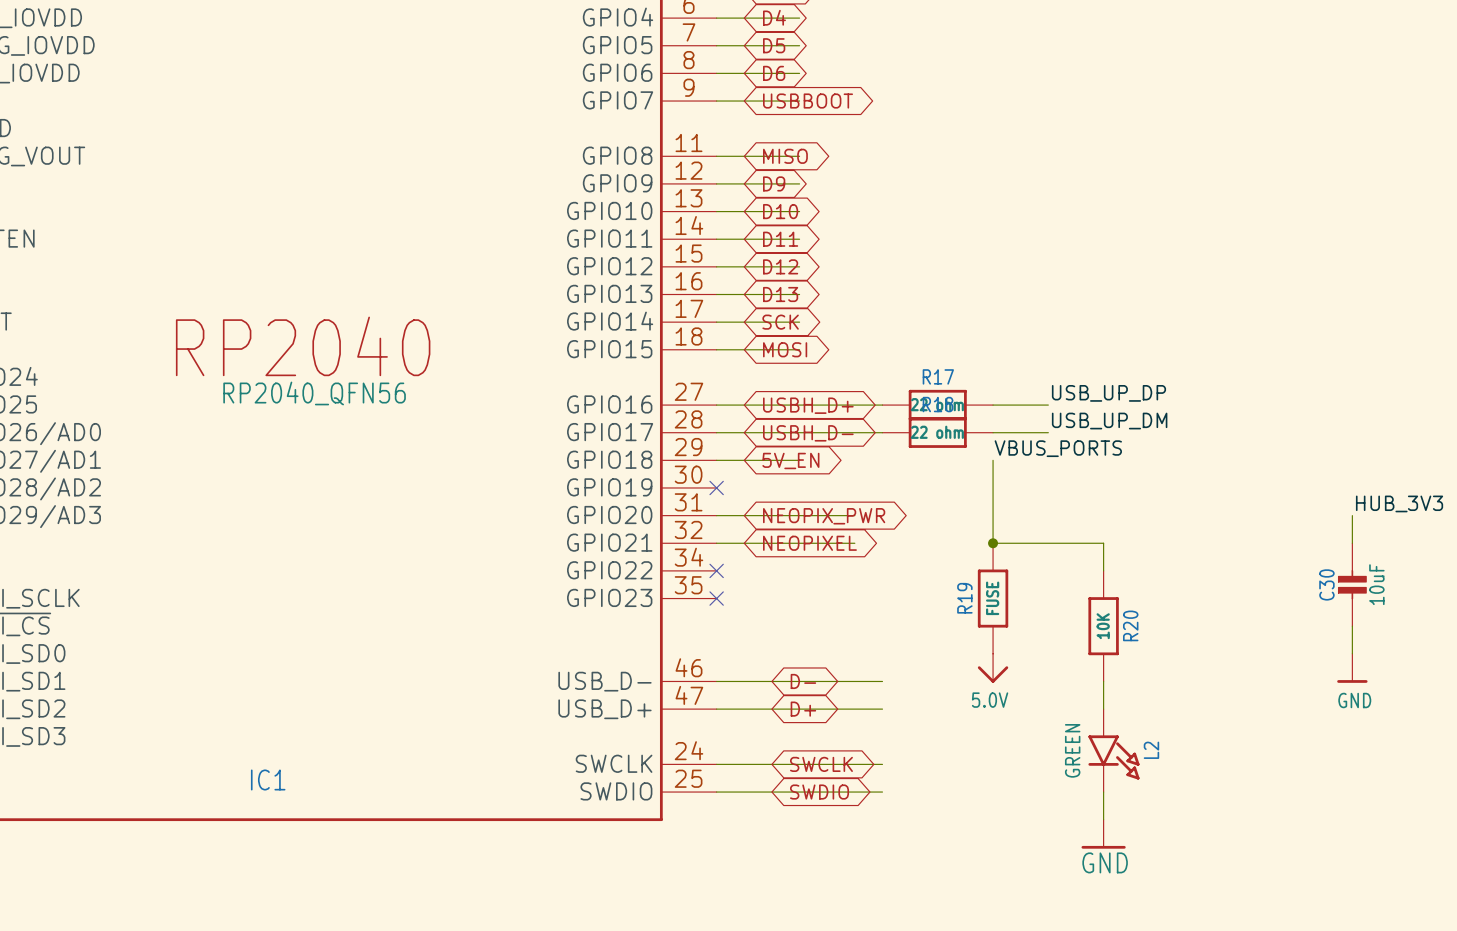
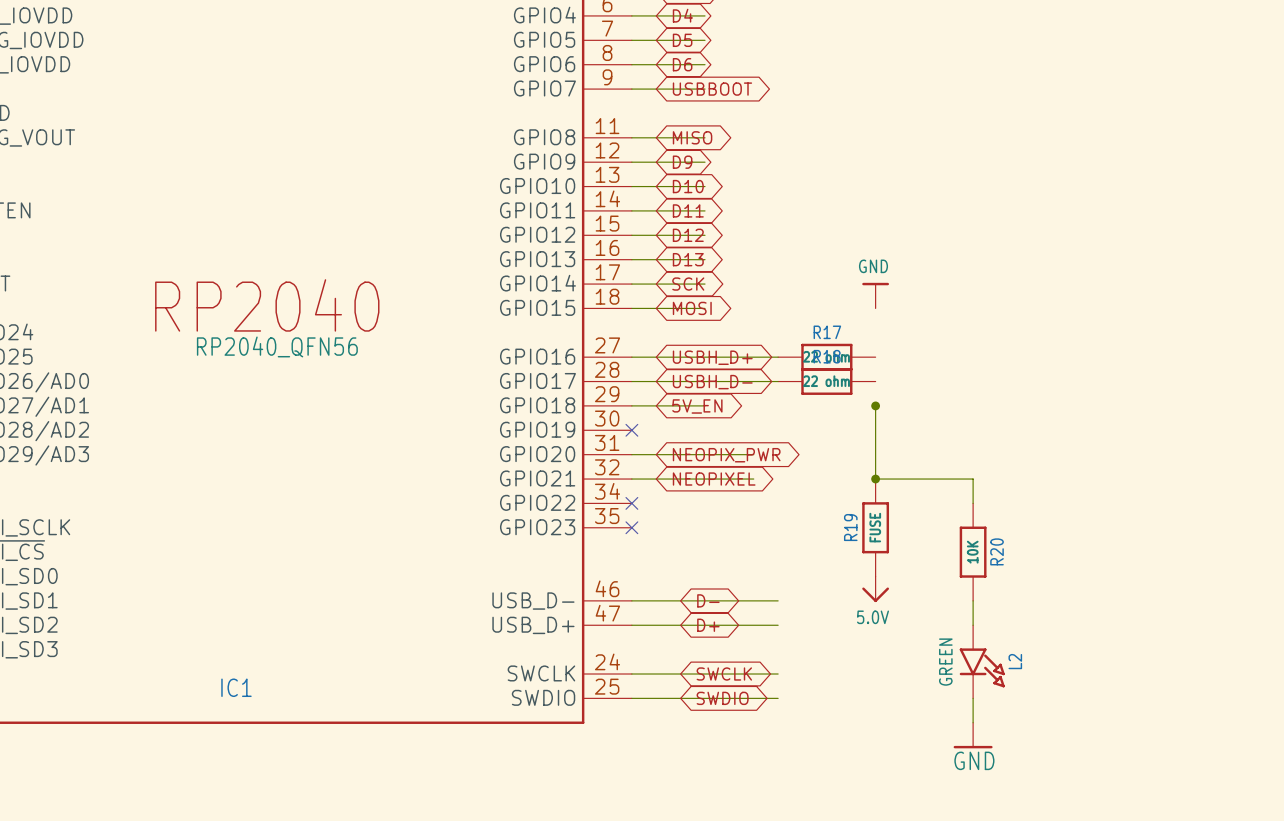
power symbol: none -> GND (875, 295)
label: USB_UP_DP (1108, 393) -> none
wire: (993, 405) (1048, 405) -> none
label: USB_UP_DM (1109, 421) -> none
wire: (993, 432) (1048, 432) -> none
label: VBUS_PORTS (1058, 448) -> none
junction: none -> (875, 405)
label: HUB_3V3 (1399, 503) -> none
wire: (1352, 515) (1352, 543) -> none
C30: 10uF (1352, 584) -> none
wire: (1352, 626) (1352, 653) -> none
power symbol: GND (1352, 668) -> none

